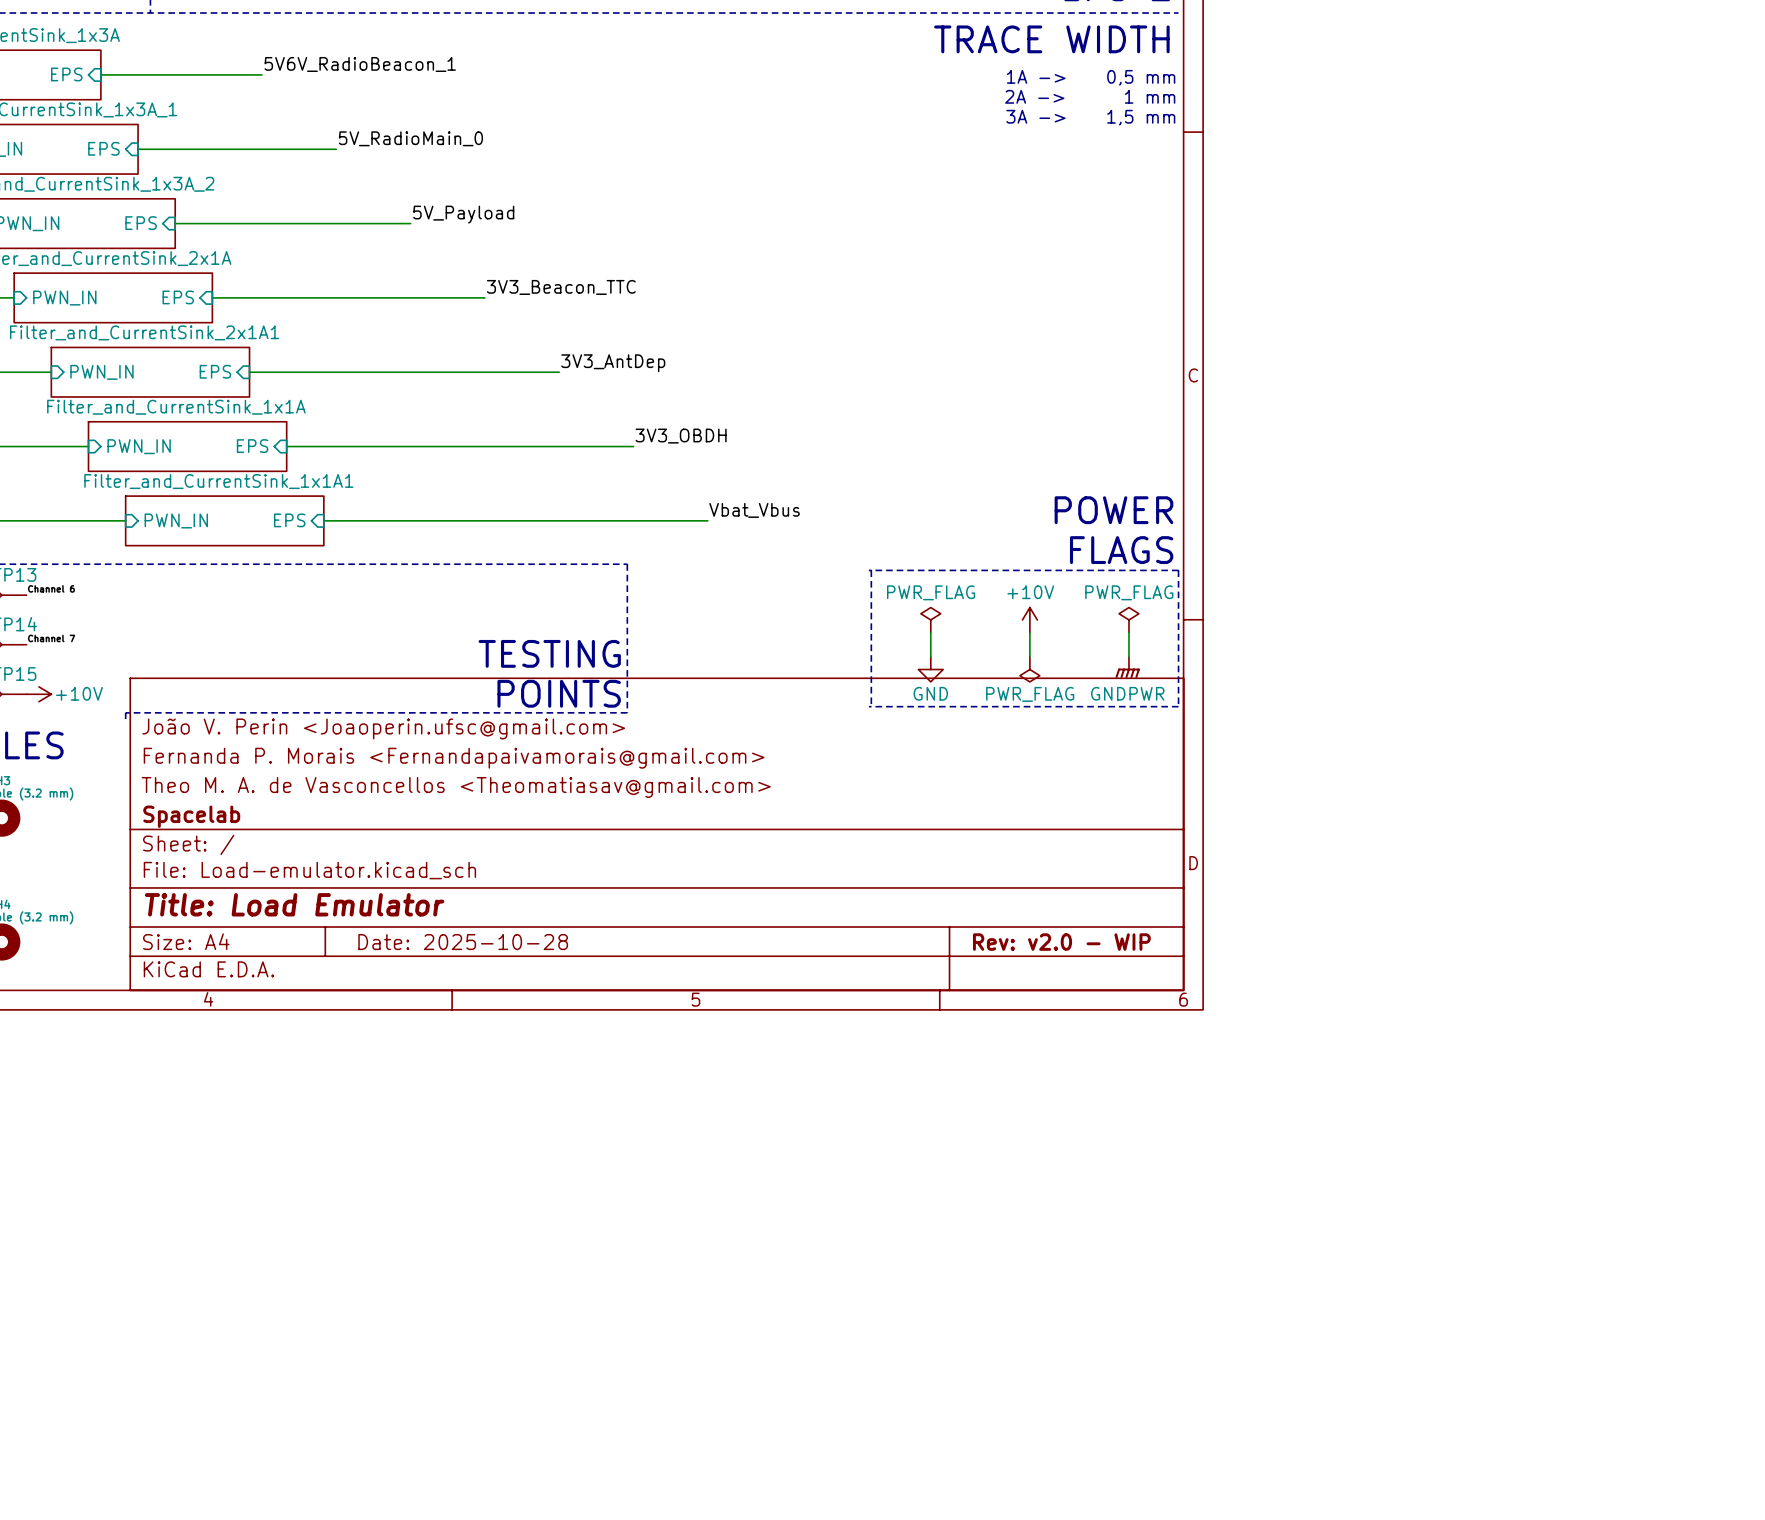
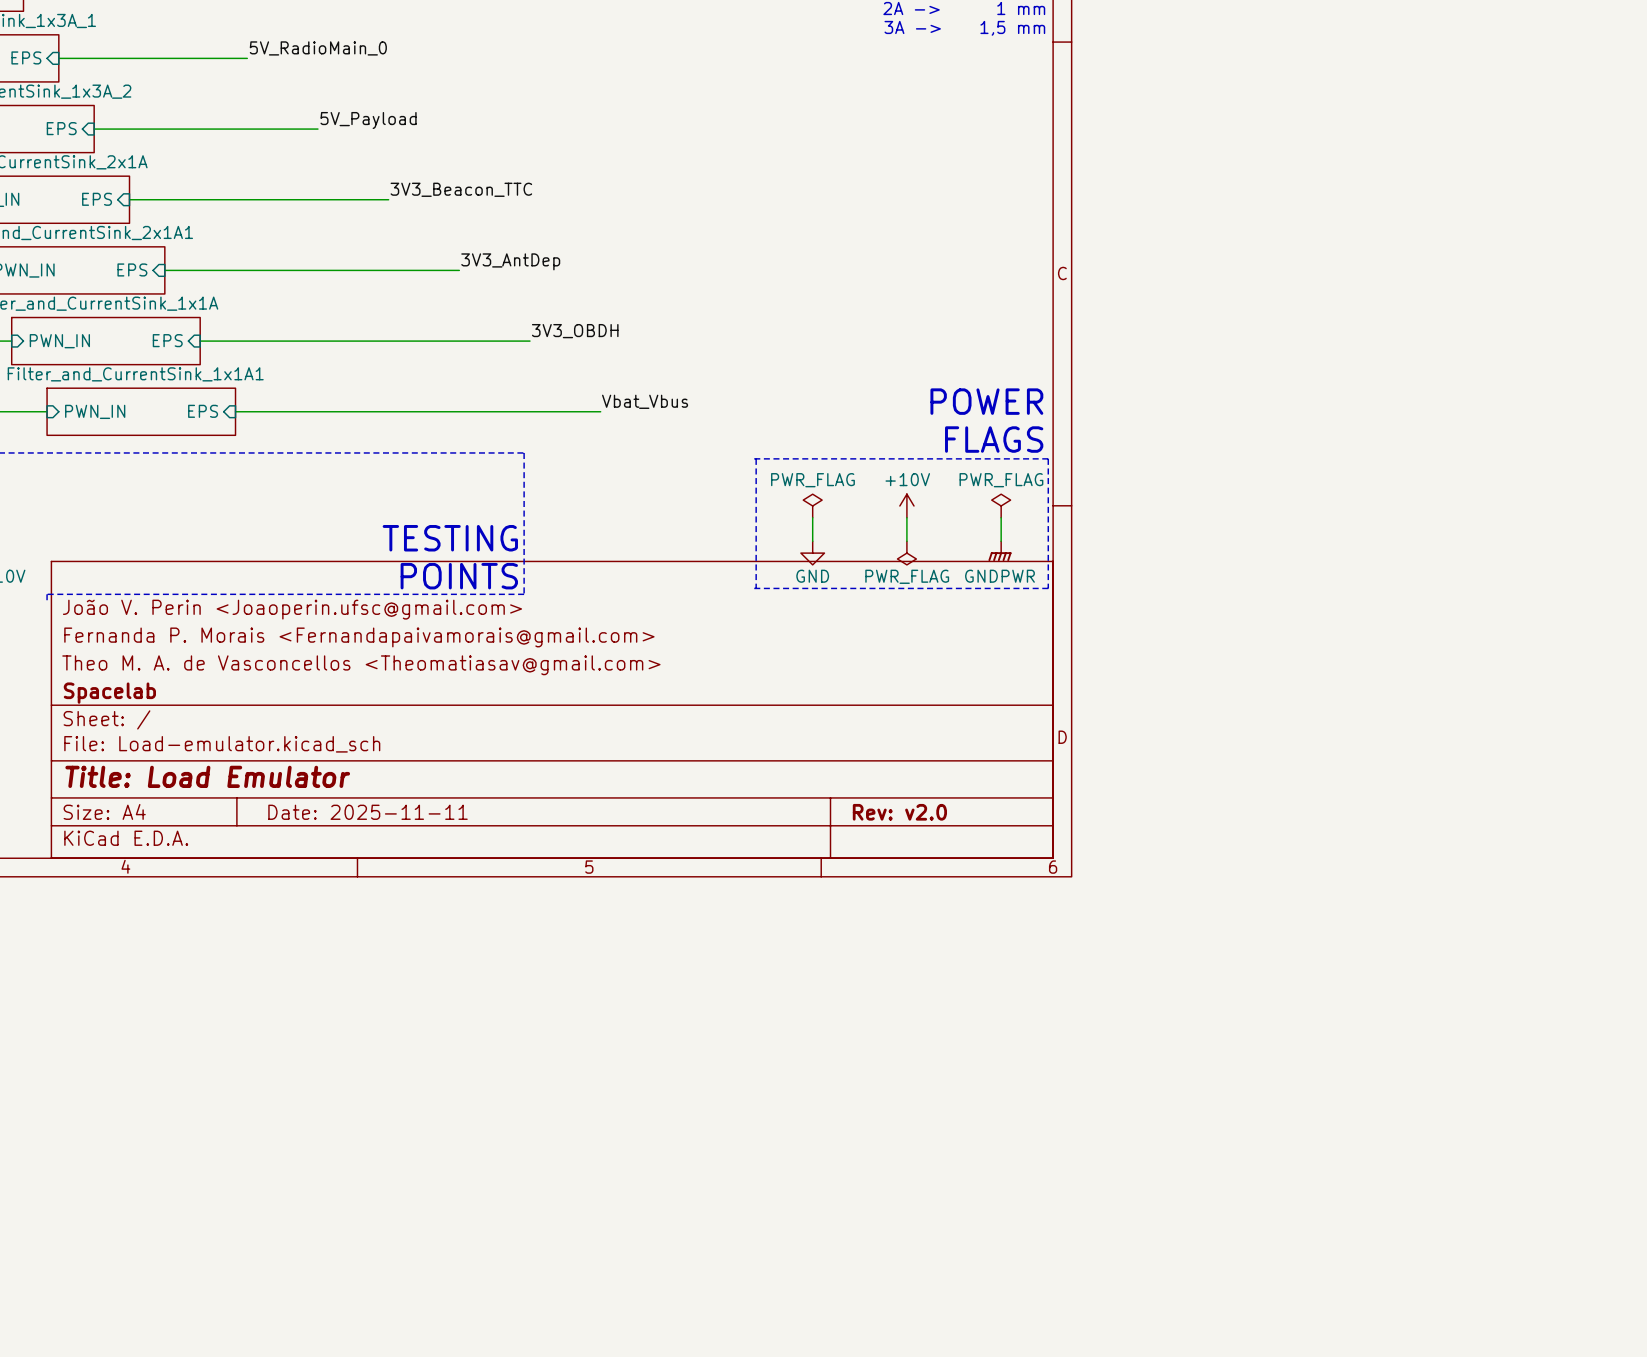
title block: Date: 2025-10-28 (463, 942) -> Date: 2025-11-11 (368, 812)
title block: Rev: v2.0 - WIP (1061, 942) -> Rev: v2.0 (899, 812)

